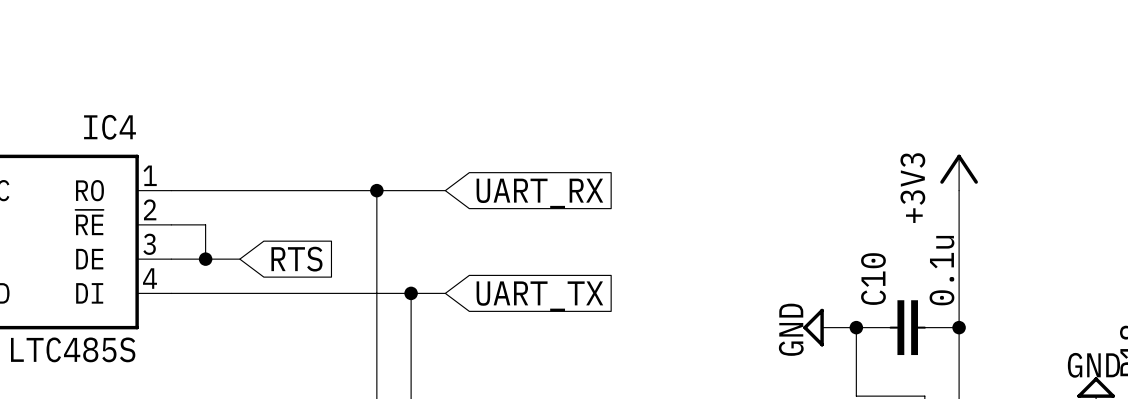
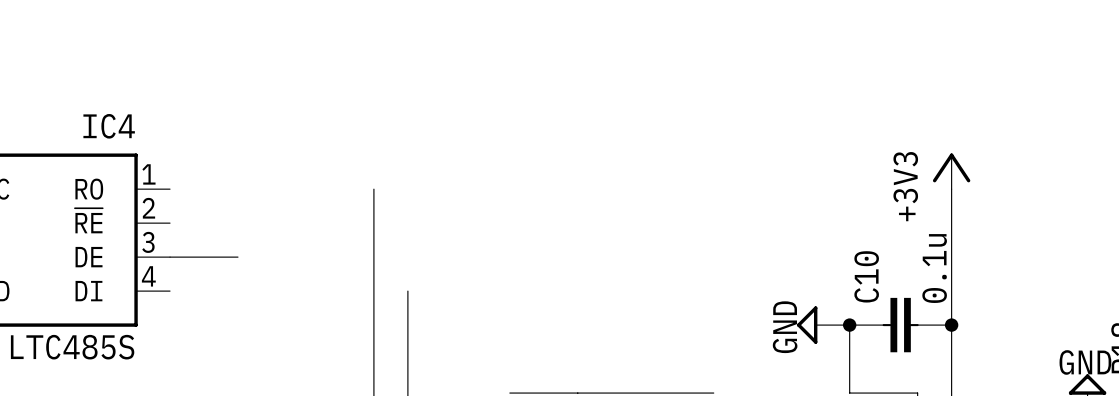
wire: (171, 190) (445, 190) -> none
junction: (376, 190) -> none
global label: UART_RX (539, 193) -> none
wire: (171, 224) (205, 224) (205, 259) -> none
junction: (205, 259) -> none
global label: RTS (296, 259) -> none
wire: (171, 293) (445, 293) -> none
junction: (411, 293) -> none
global label: UART_TX (539, 296) -> none
wire: none -> (509, 393) (713, 393)

